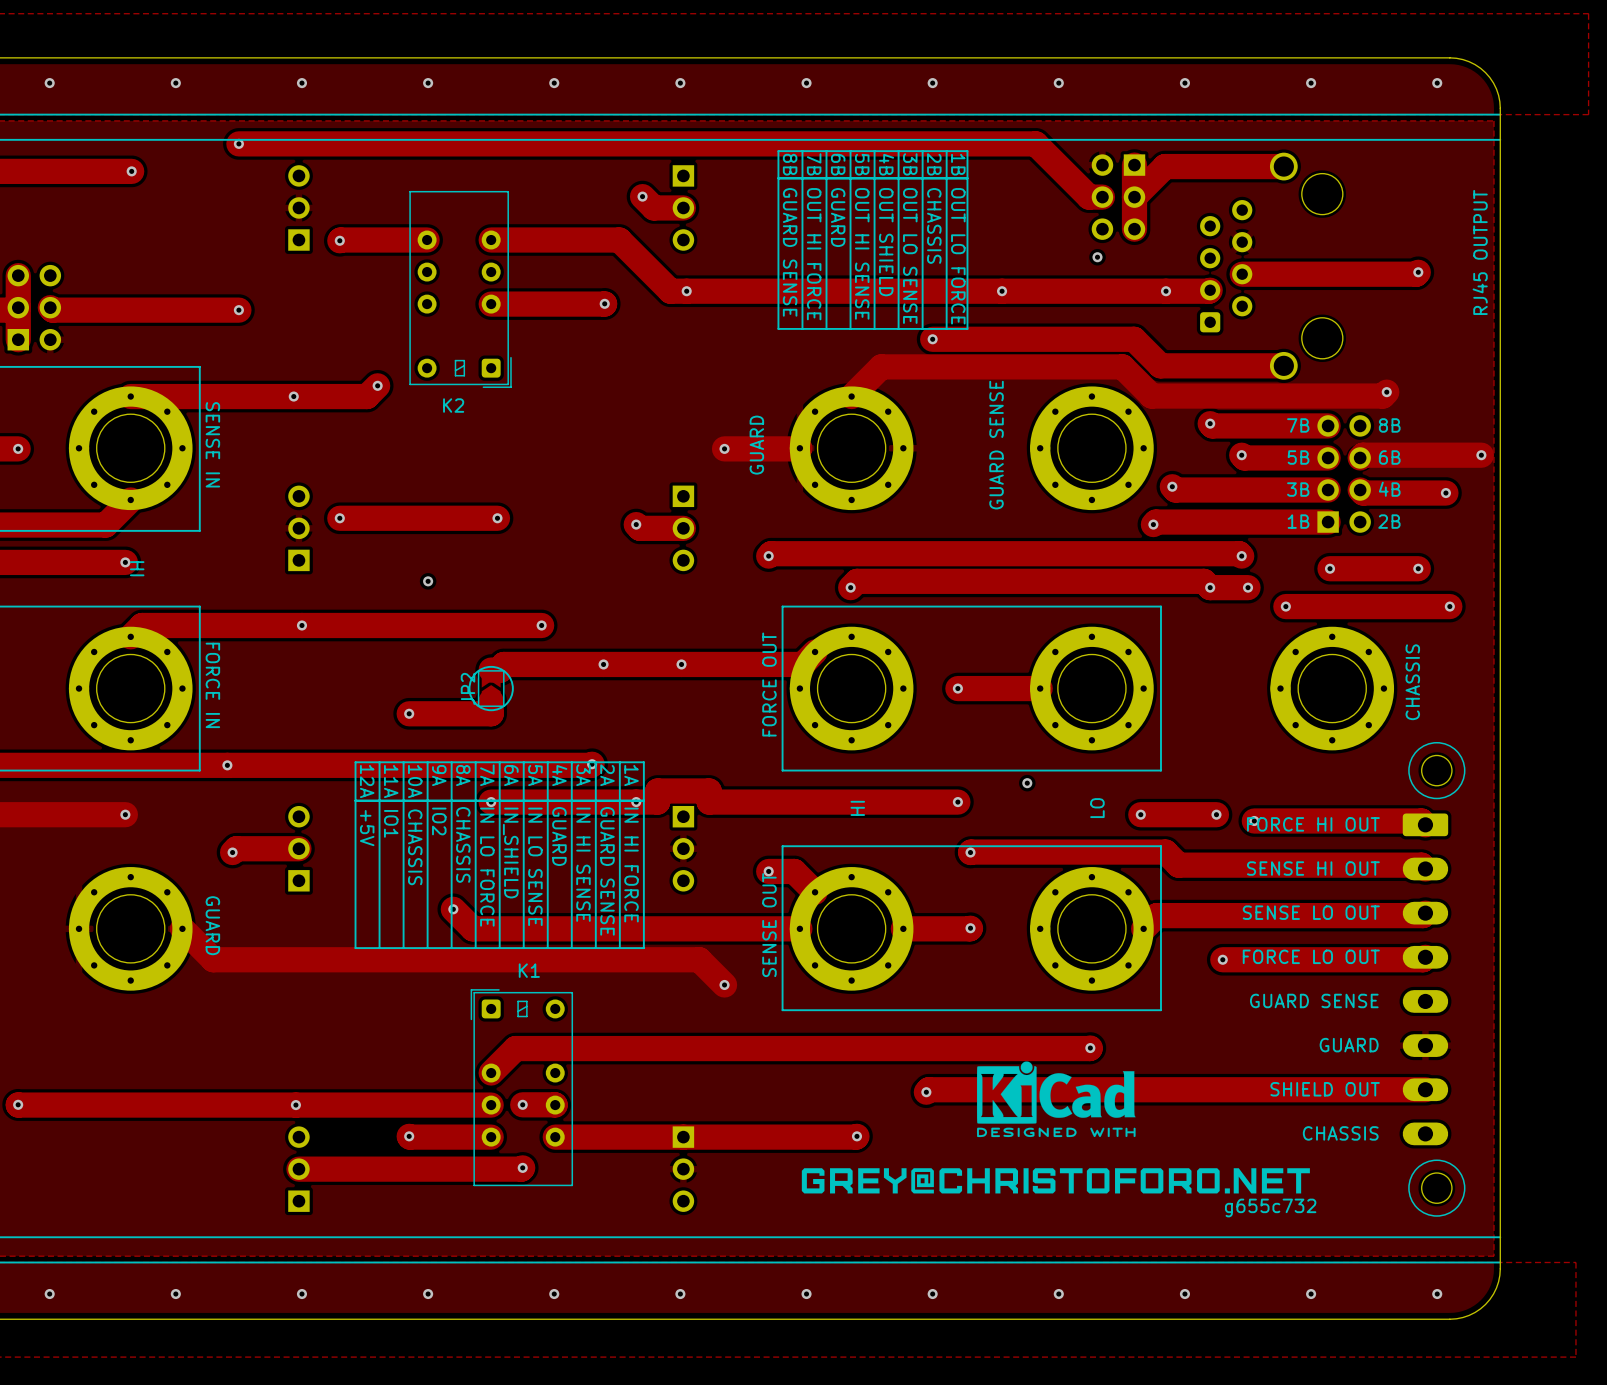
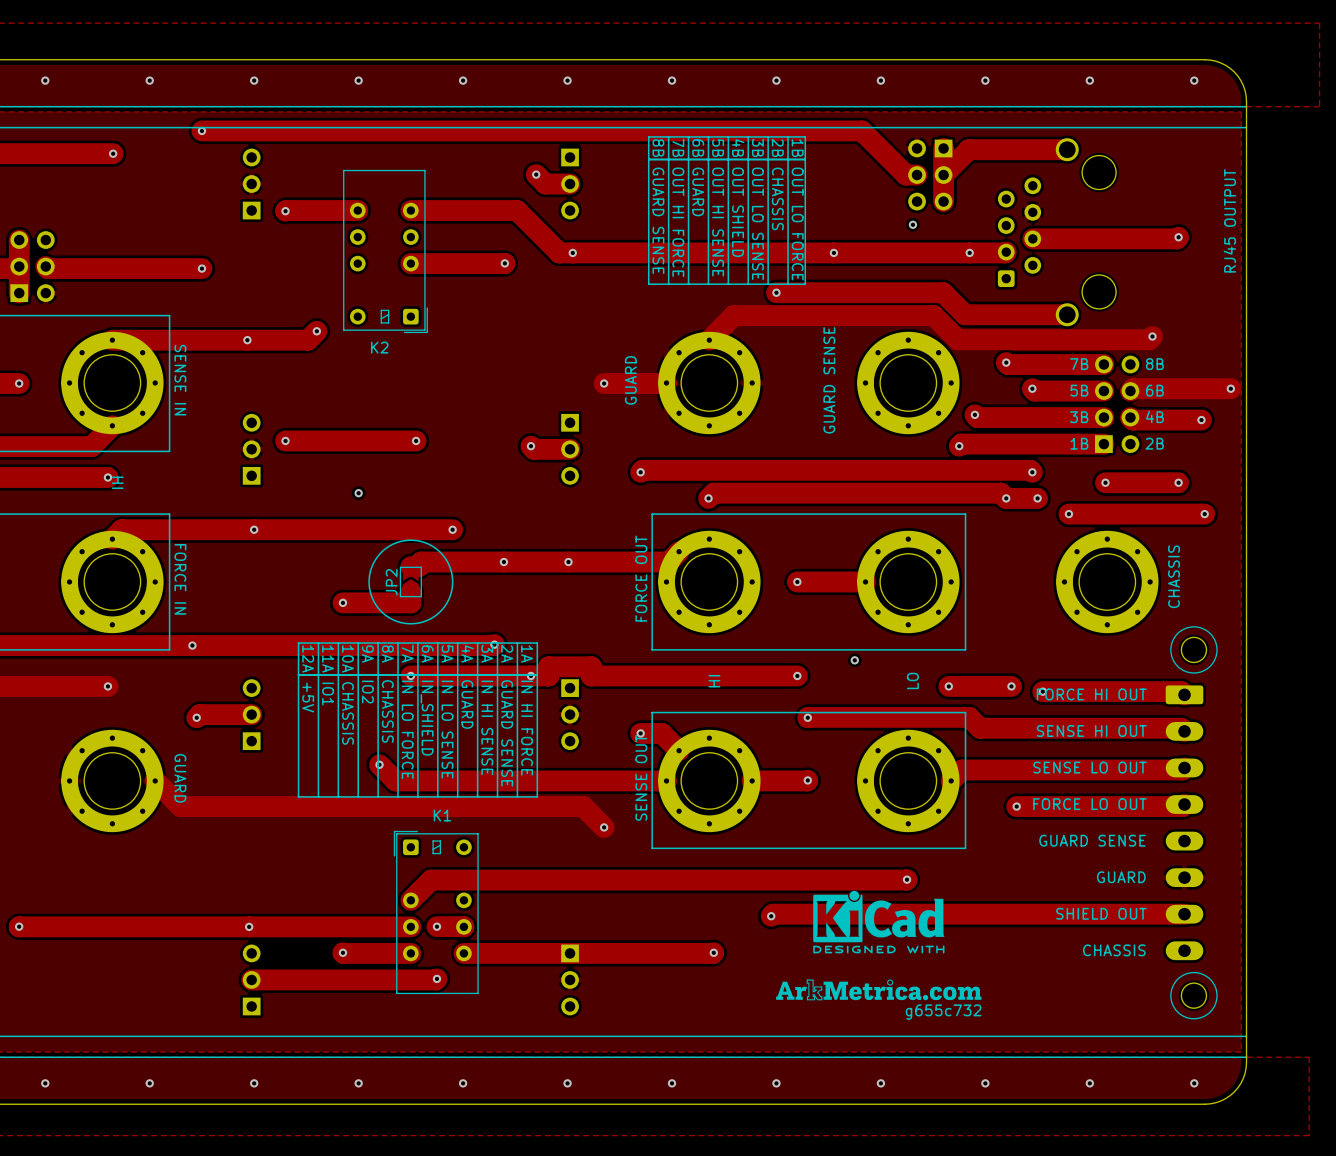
drawing shape: [468, 665, 514, 712] -> [368, 539, 454, 625]
drawing shape: [801, 1168, 1310, 1194] -> [776, 979, 982, 1001]
text position: g655c732 (1270, 1207) -> g655c732 (943, 1012)

